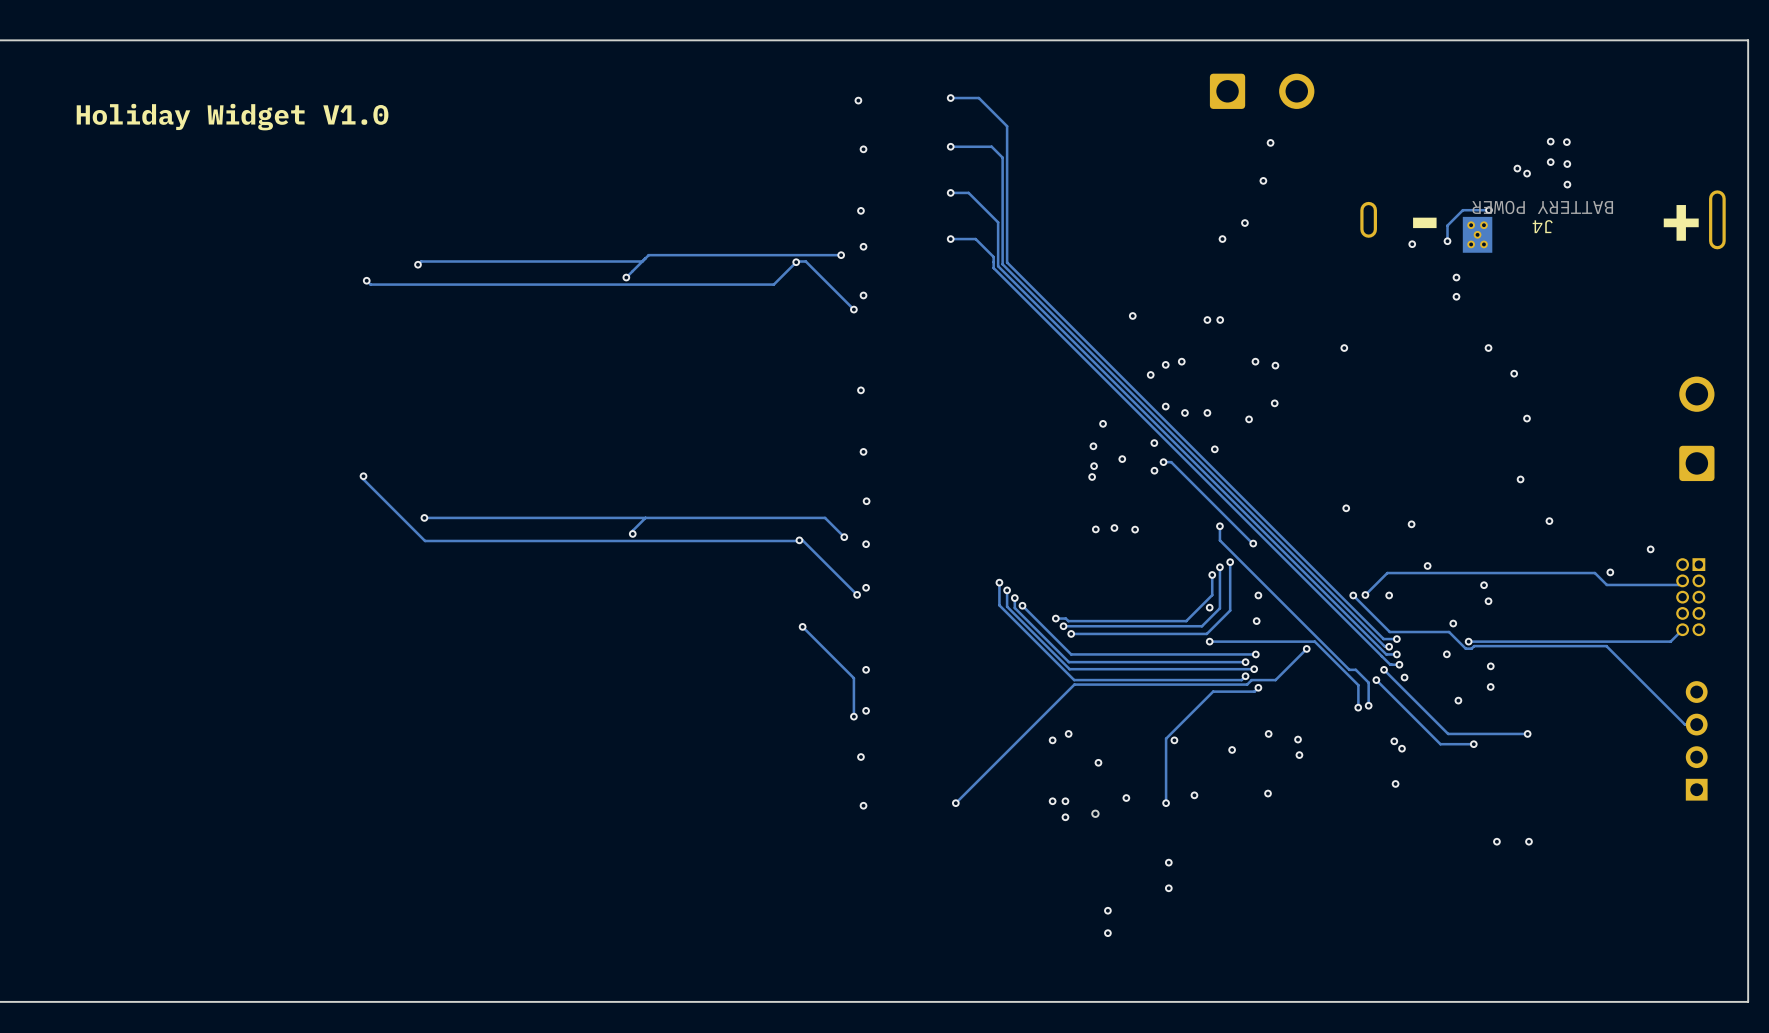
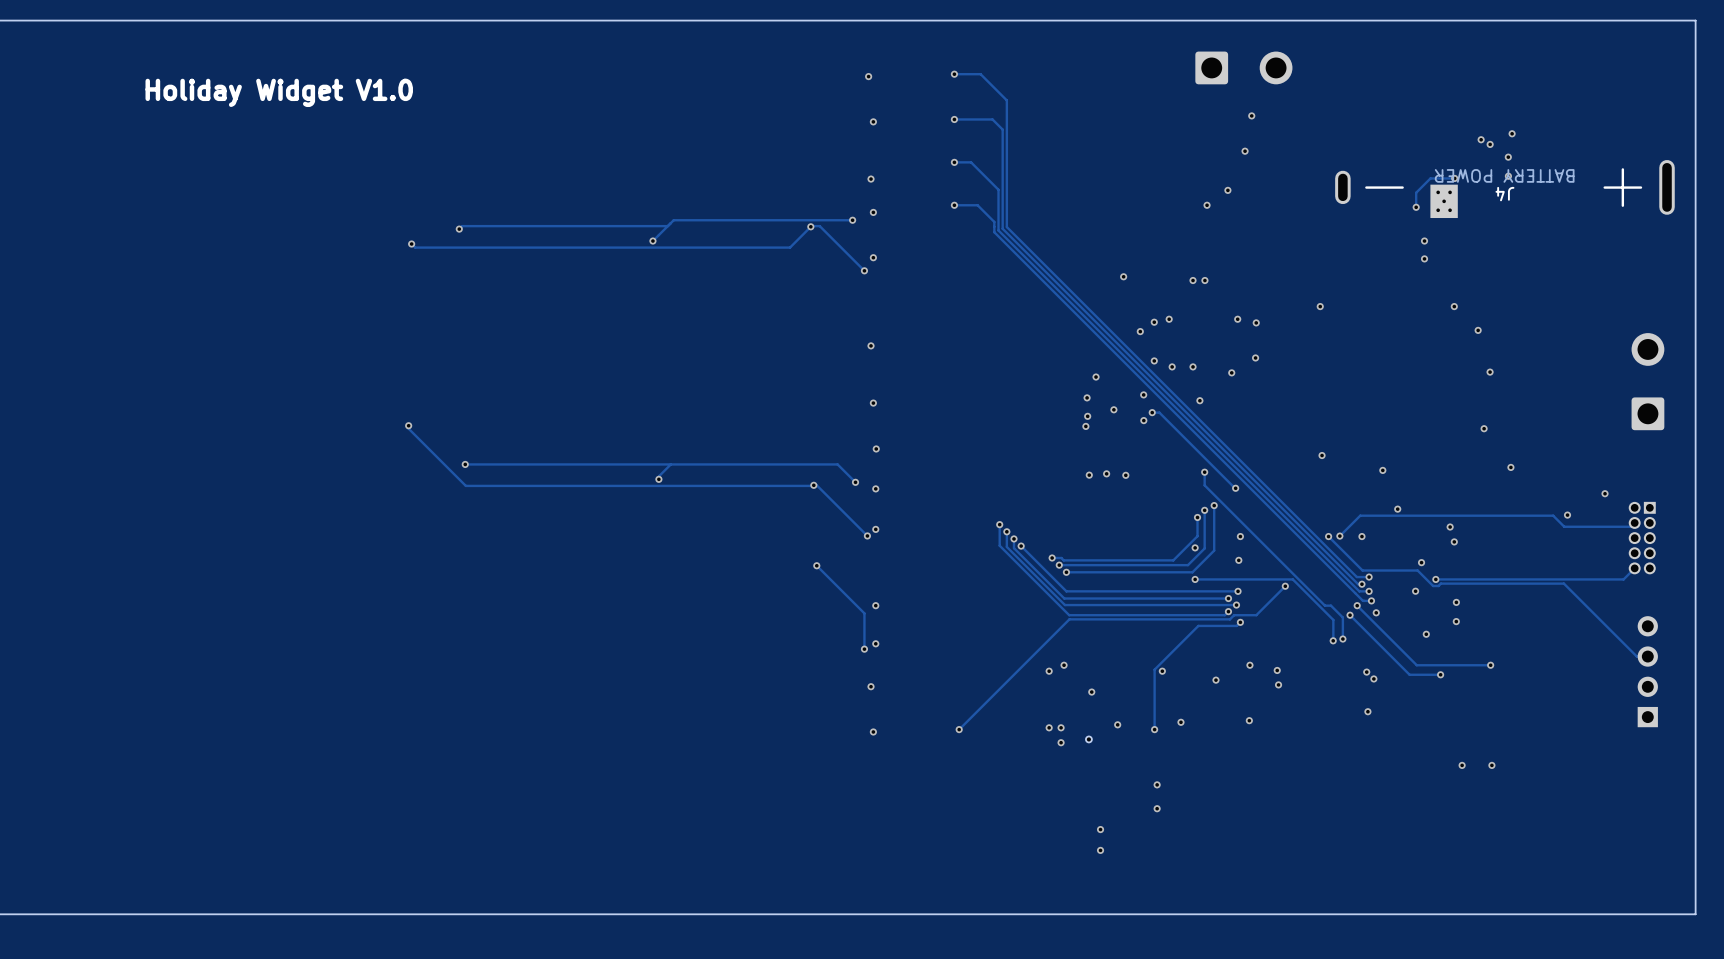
via: (1550, 141) -> none
via: (1566, 142) -> none
via: (1567, 164) -> none
via: (1567, 184) -> none
via: none -> (1508, 157)
via: none -> (1508, 176)
via: (1412, 244) -> none

